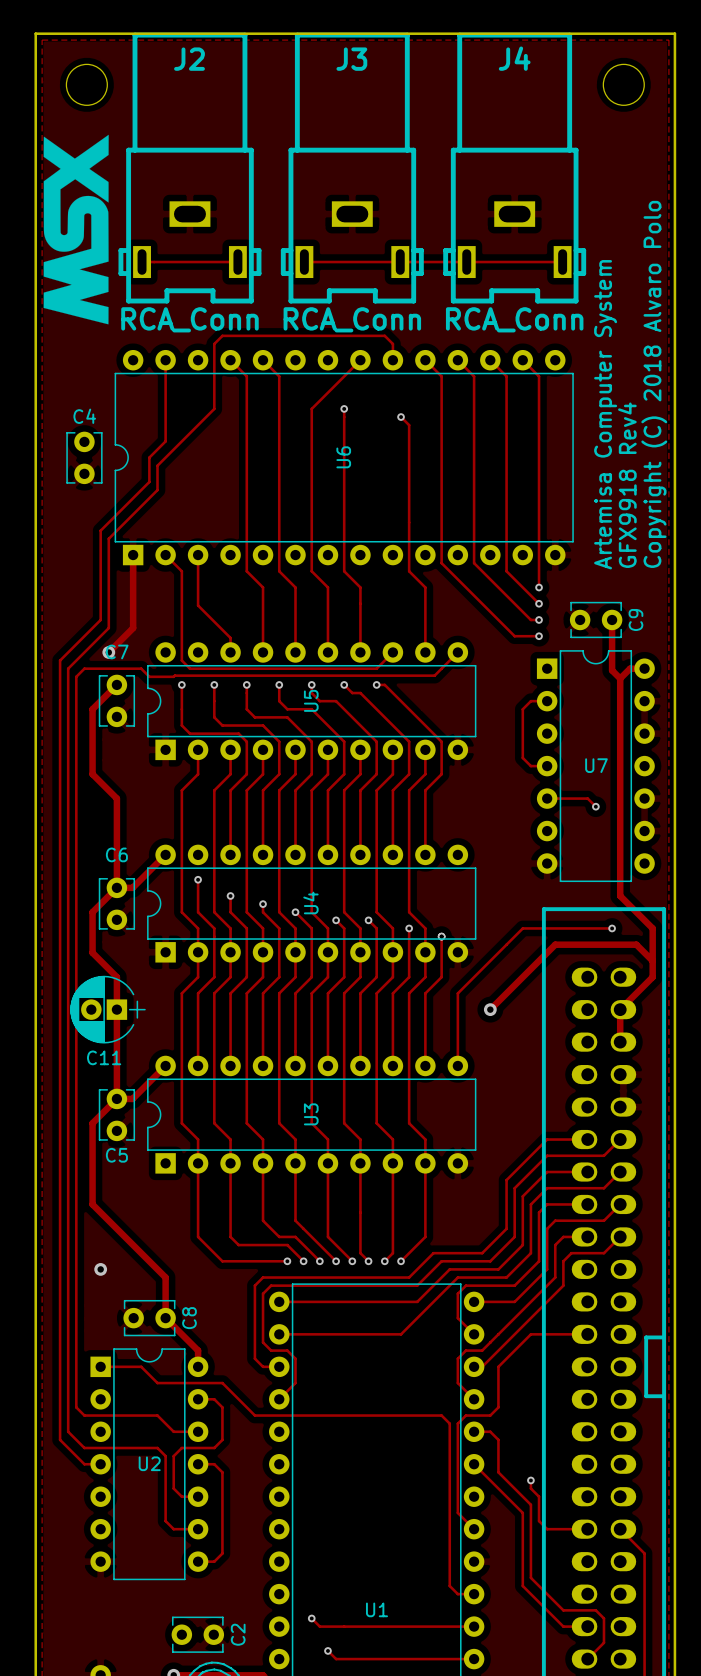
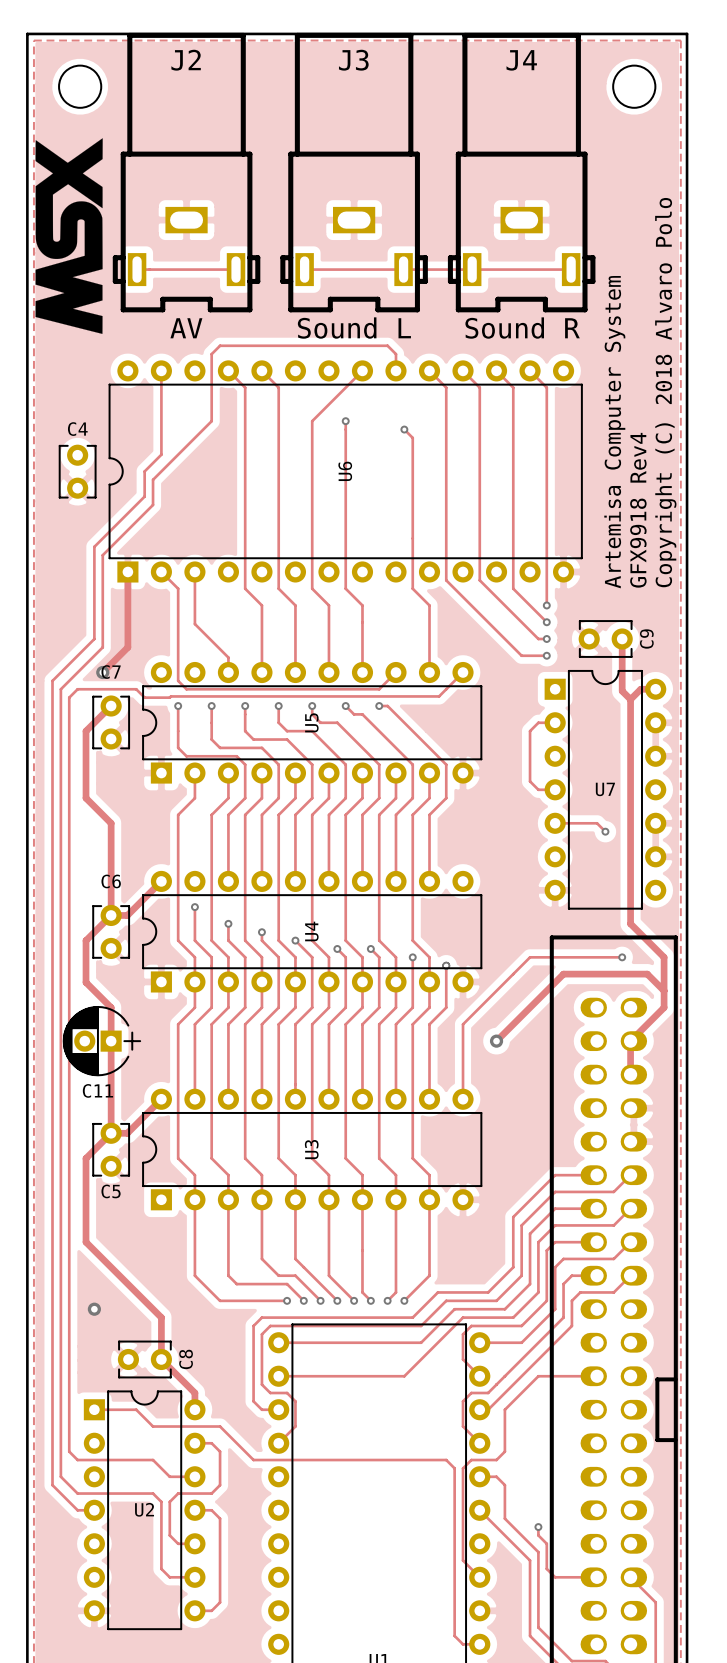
J2 value: RCA_Conn (189, 319) -> AV (186, 328)
J3 value: RCA_Conn (352, 319) -> Sound L (354, 328)
J4 value: RCA_Conn (514, 319) -> Sound R (522, 328)

